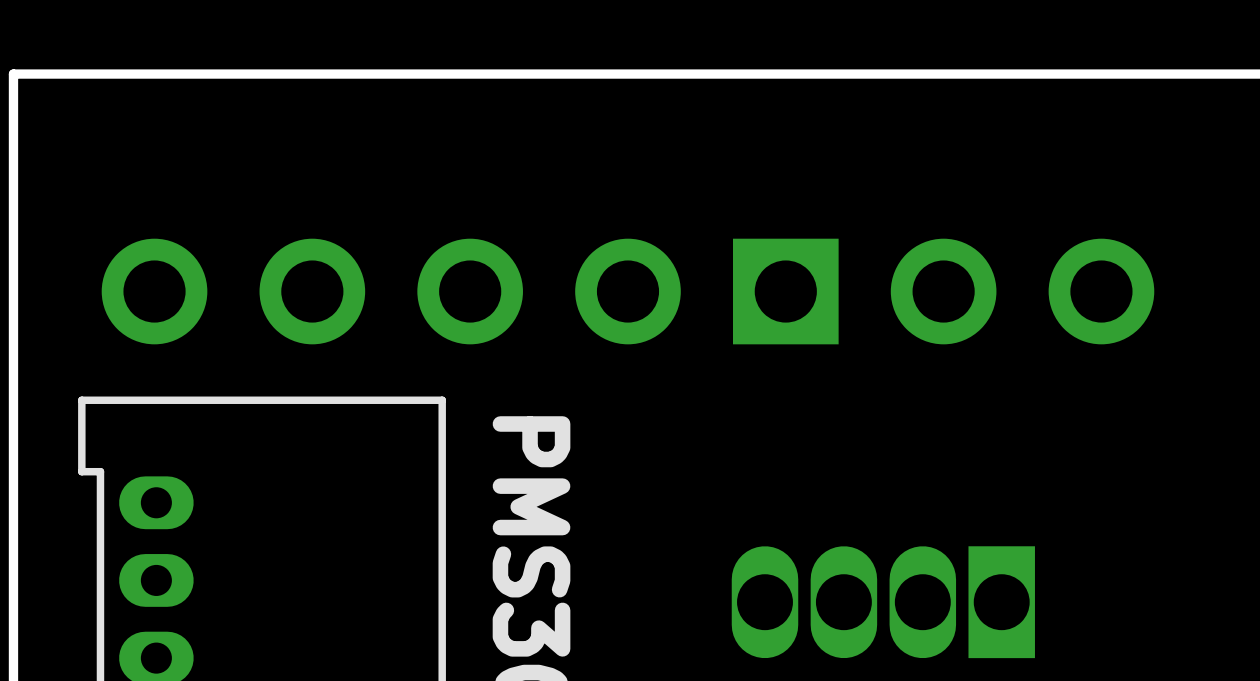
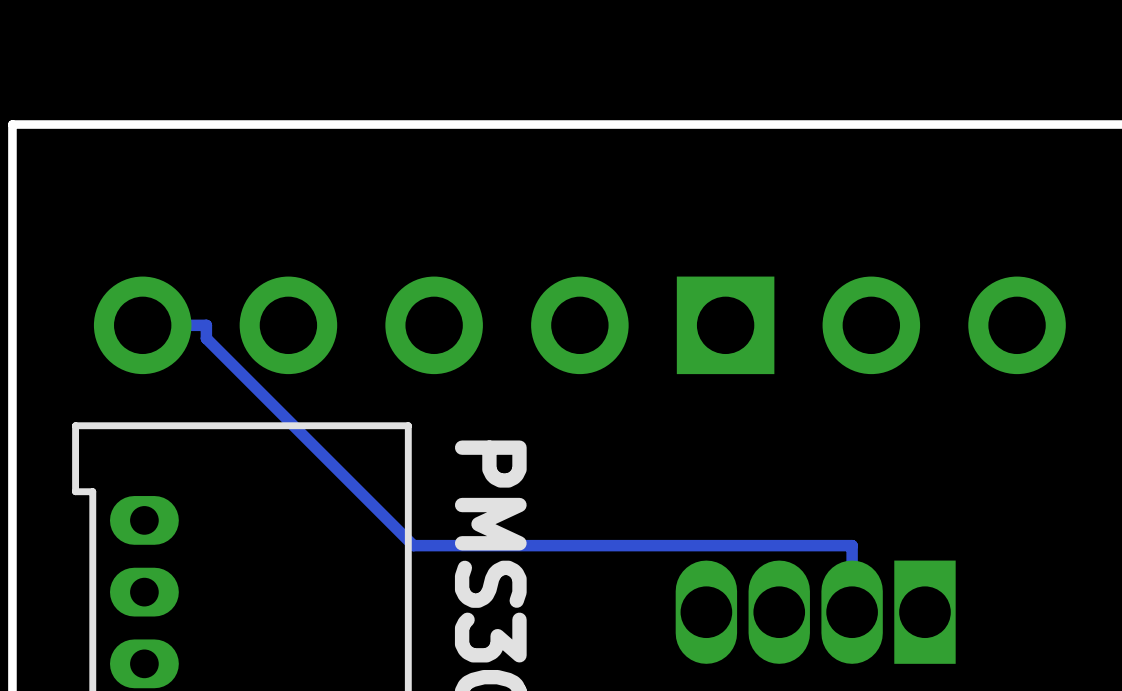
track: none -> (142, 325) (206, 325) (206, 338) (413, 545) (852, 545) (852, 612)

